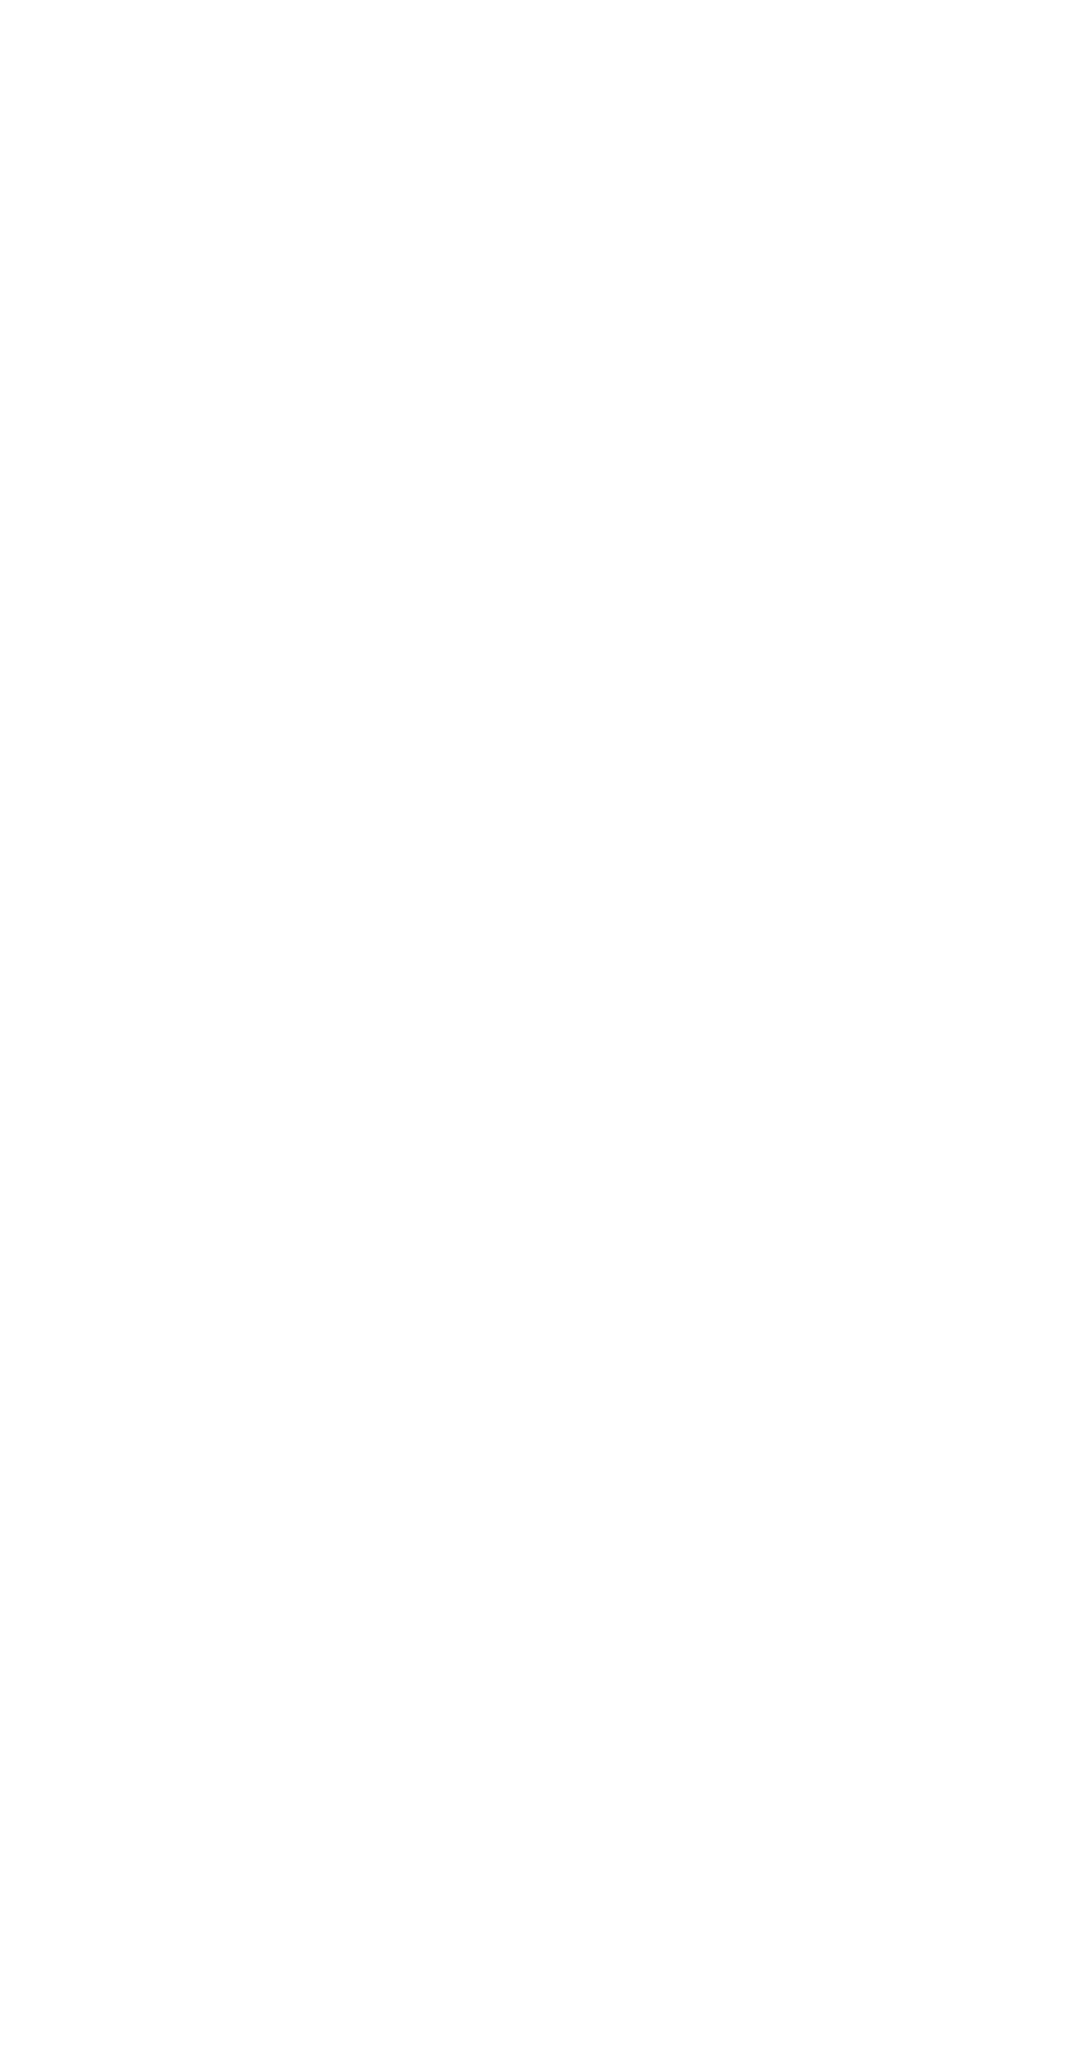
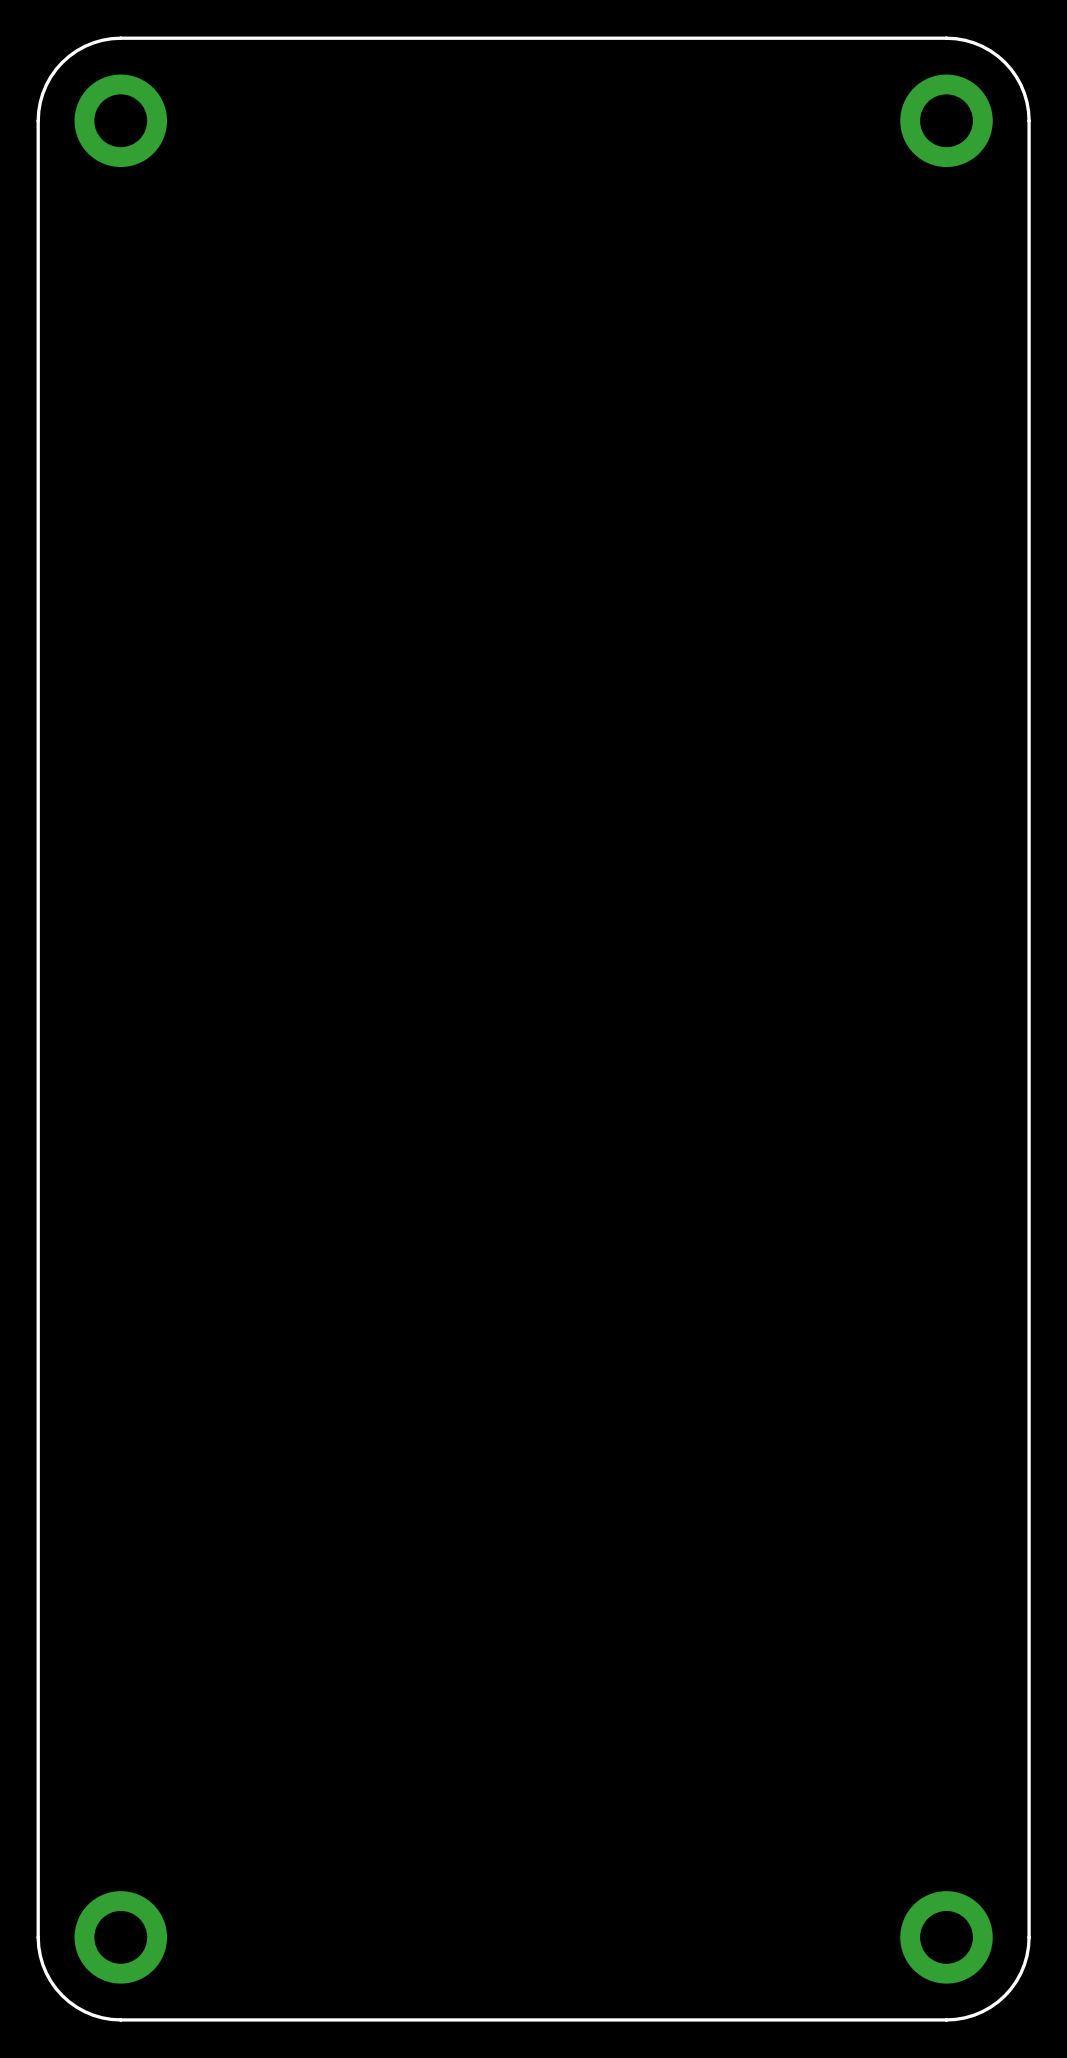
board edge: none -> (946, 38) (120, 38) (93, 42) (76, 50) (56, 69) (46, 84) (40, 102) (38, 120) (38, 1937) (42, 1964) (50, 1981) (69, 2001) (84, 2011) (102, 2017) (120, 2019) (946, 2019) (973, 2015) (990, 2007) (1011, 1988) (1020, 1973) (1027, 1955) (1029, 1937) (1029, 120) (1024, 93) (1016, 76) (1004, 62) (990, 50) (973, 42) (946, 38)
part: none -> (120, 120)
part: none -> (946, 120)
part: none -> (120, 1937)
part: none -> (946, 1937)

